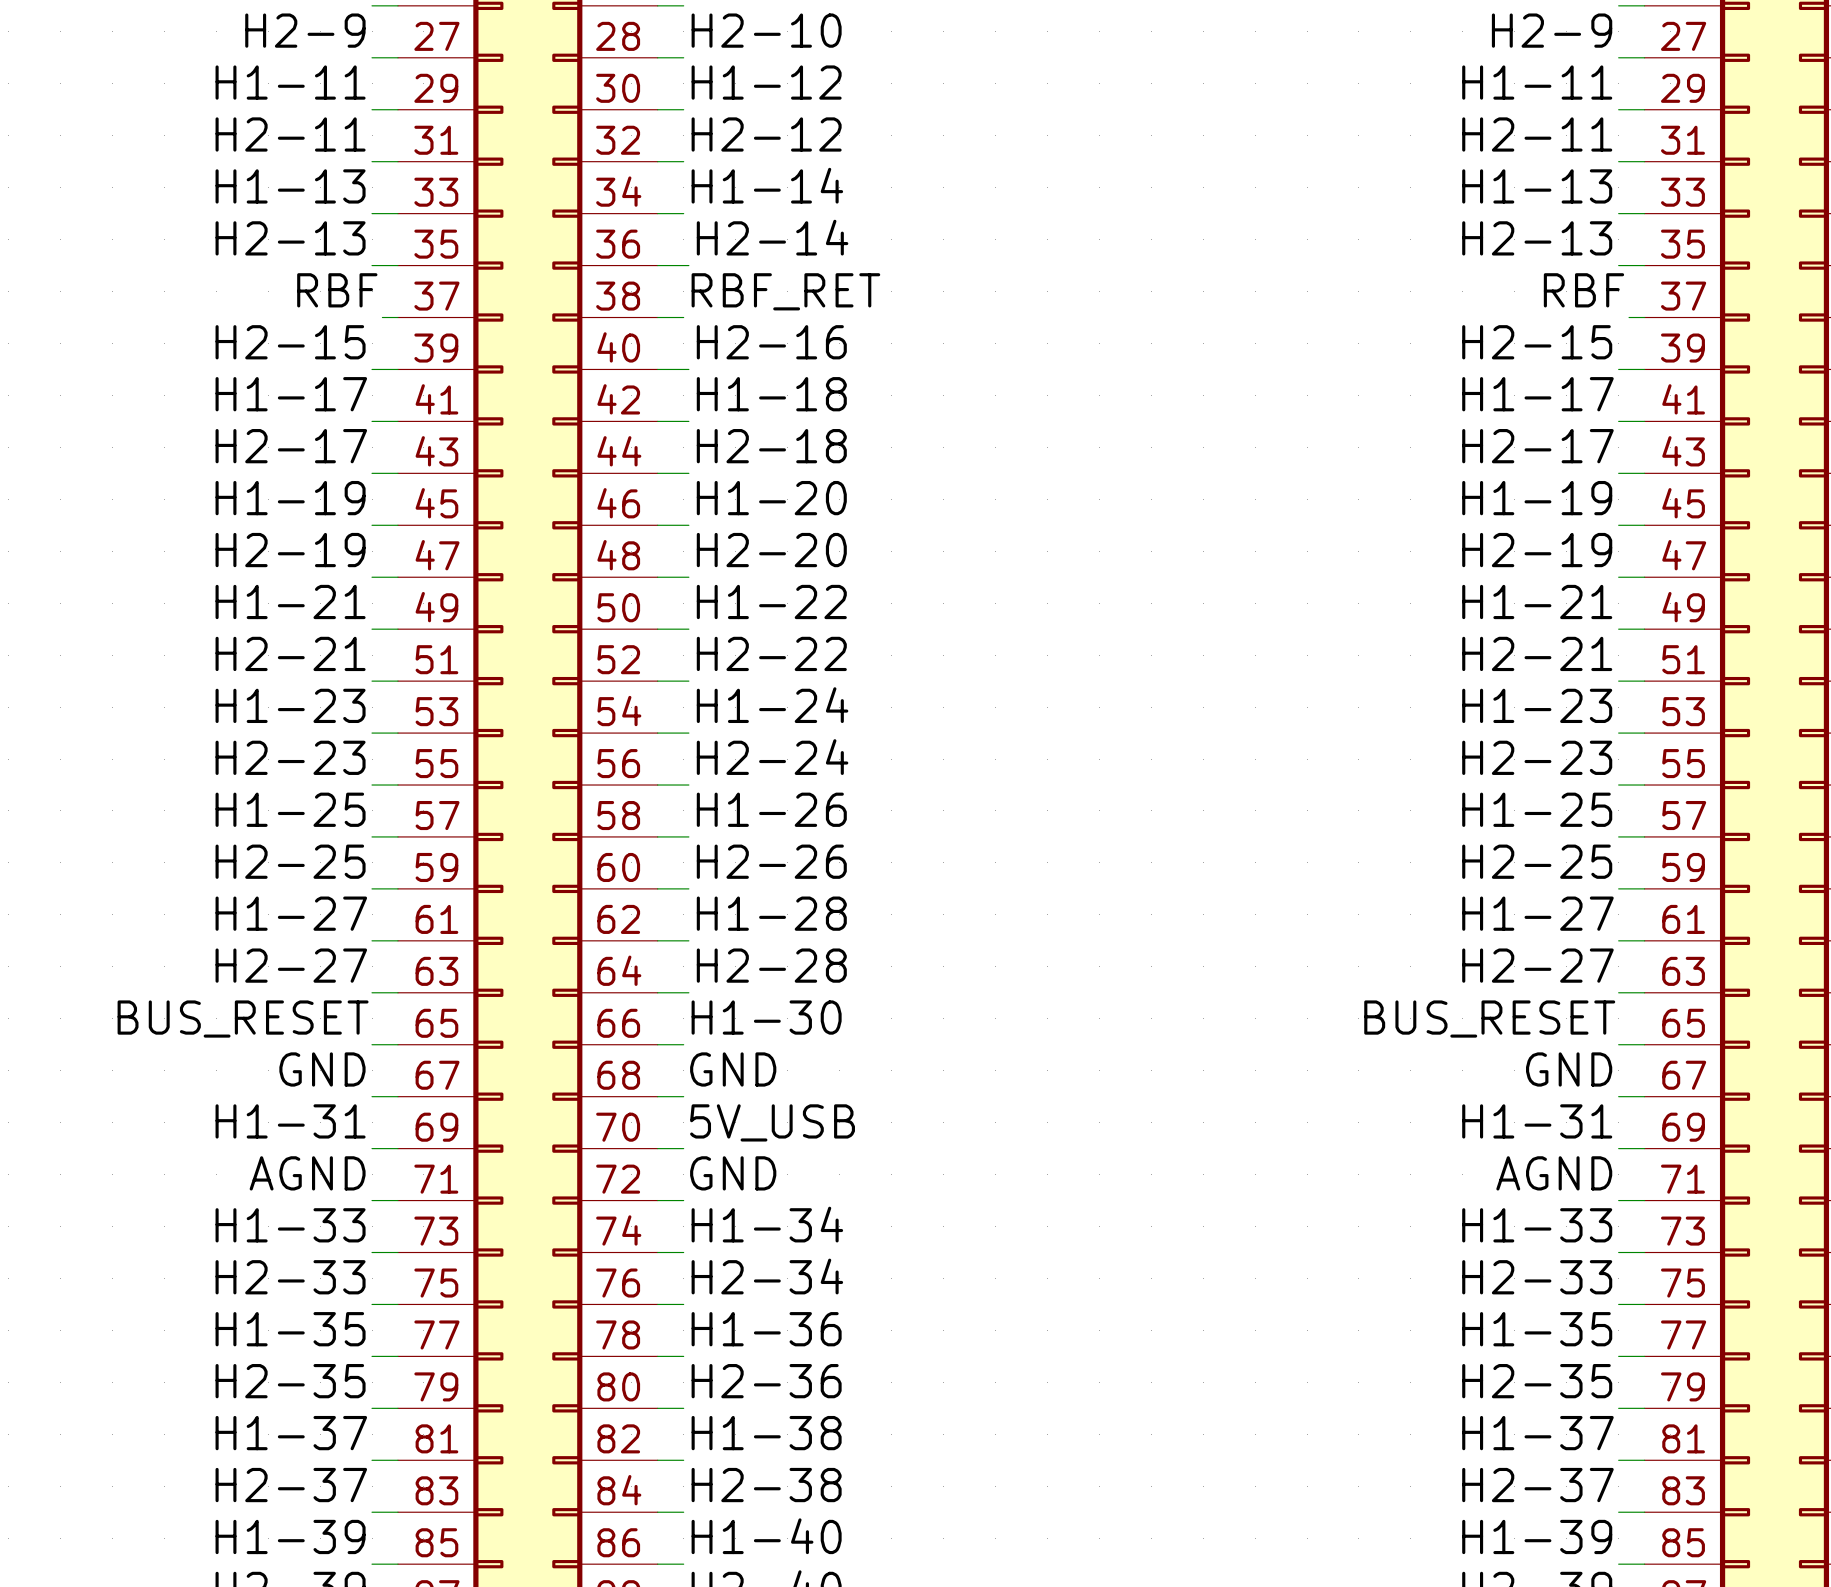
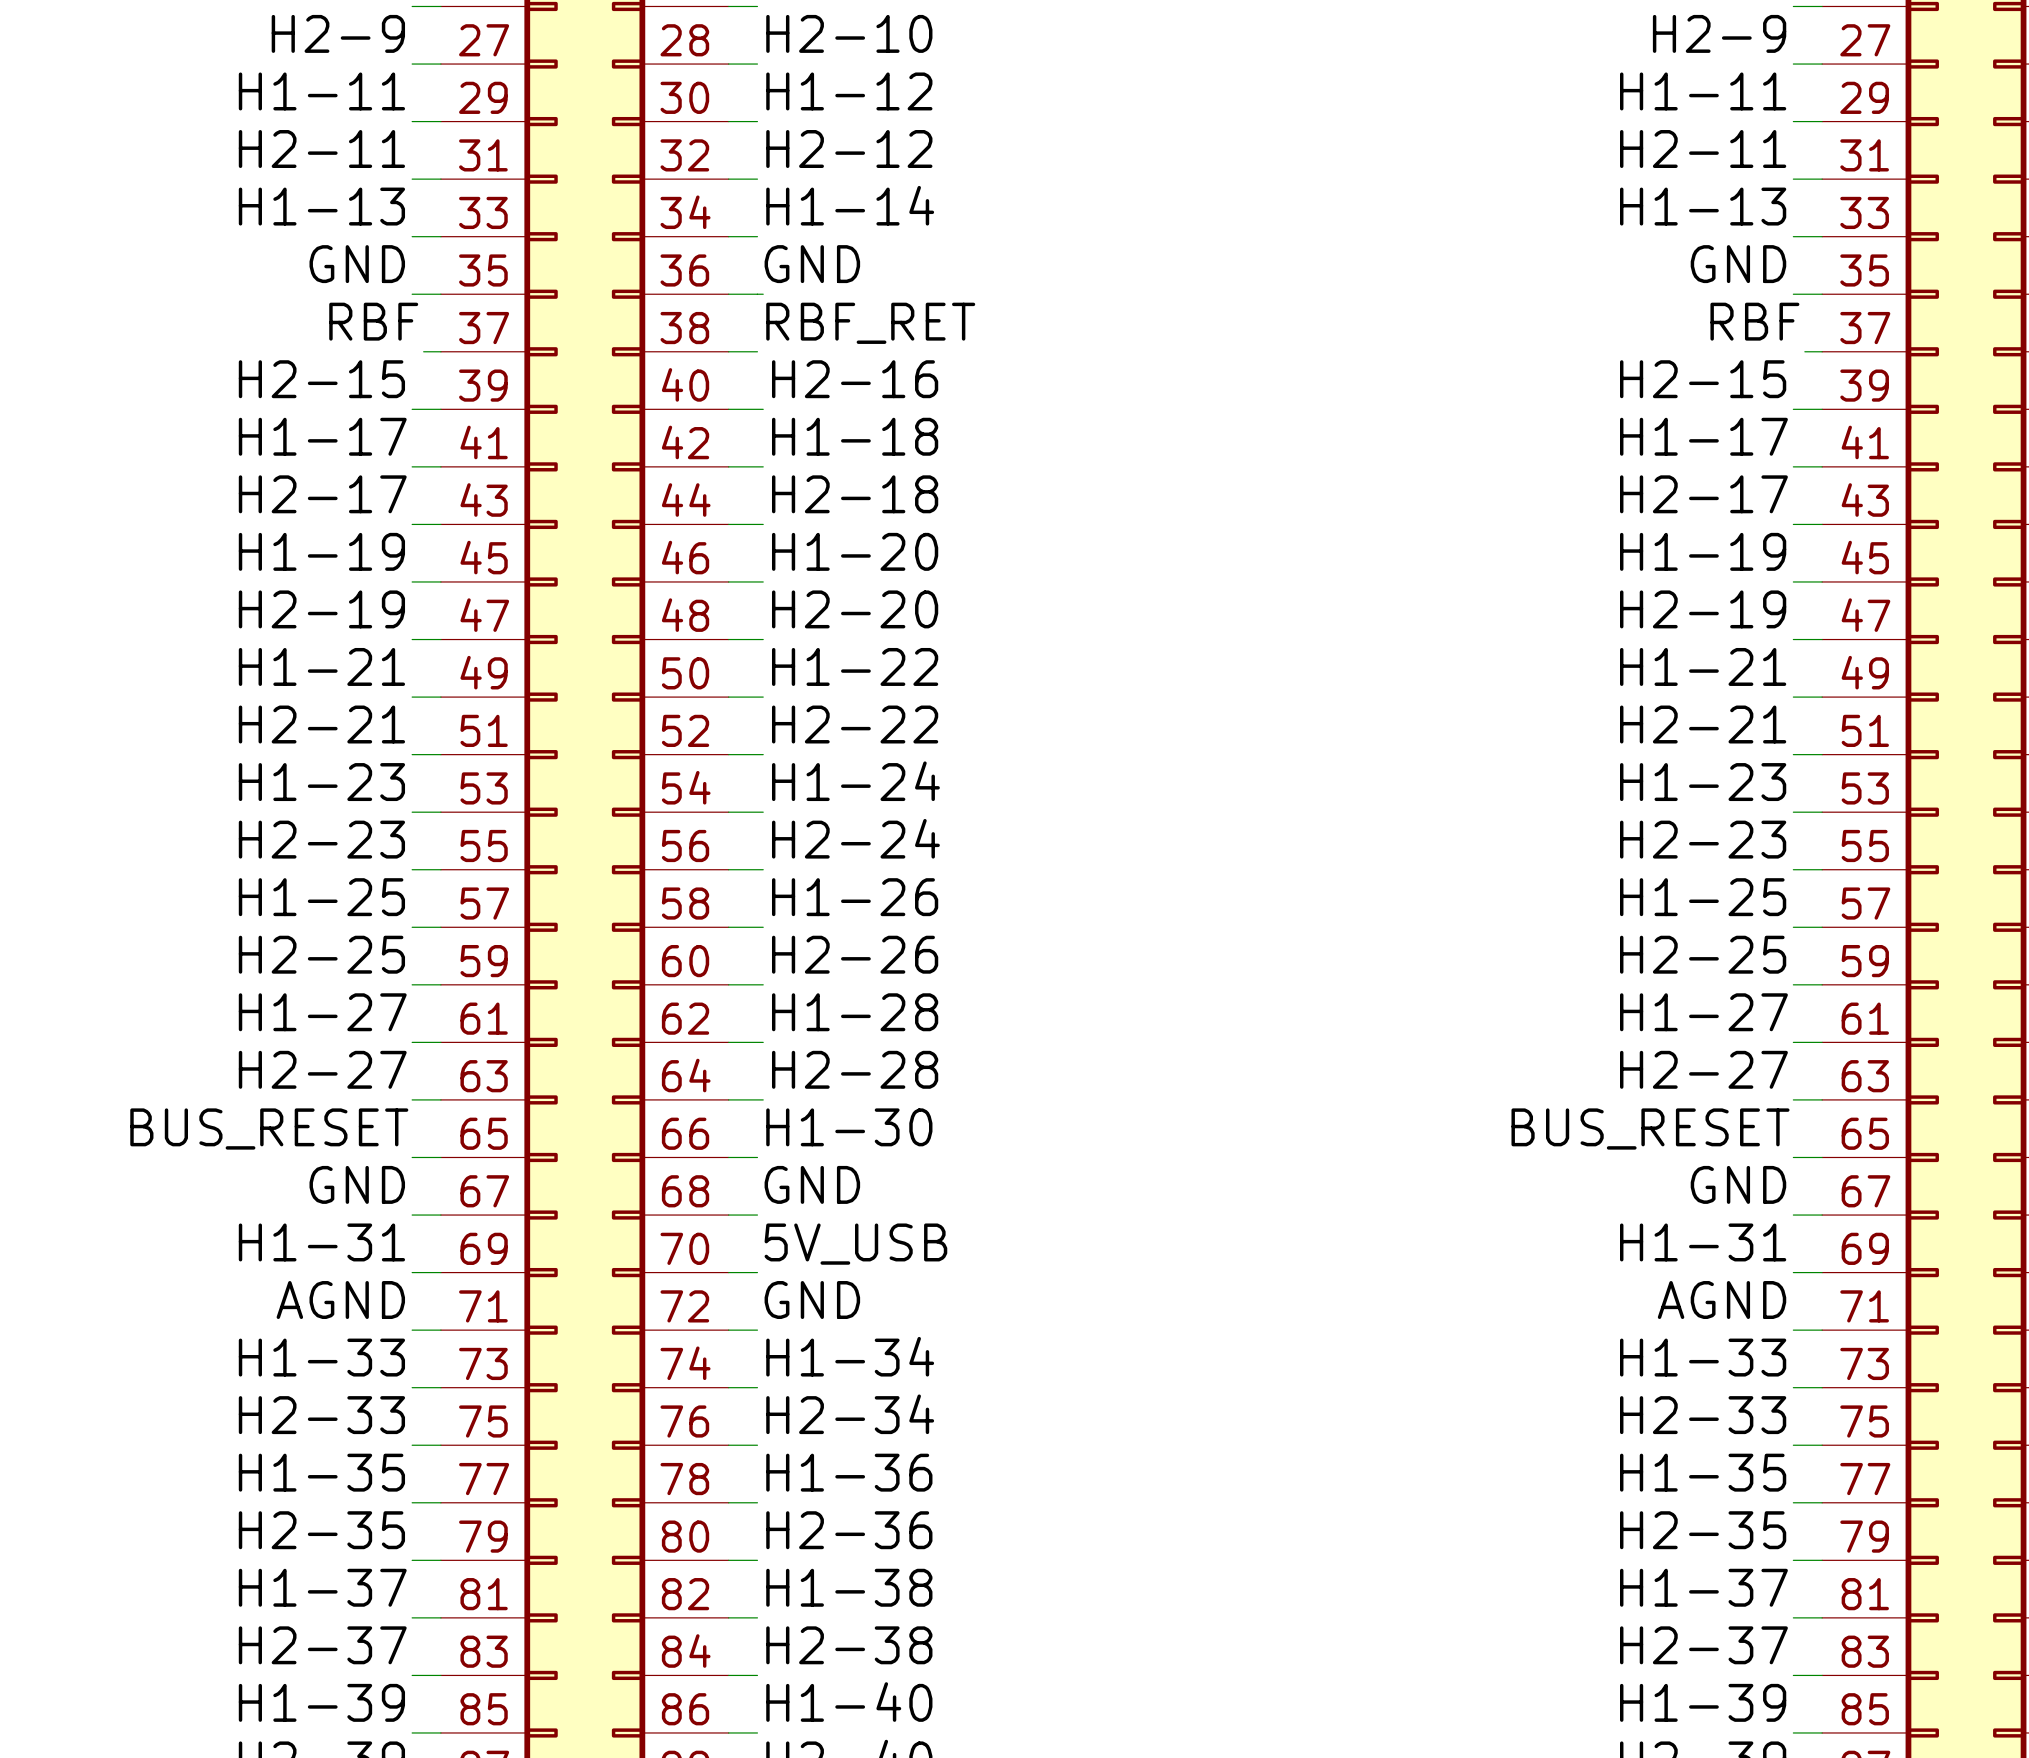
label: H2-14 (772, 237) -> GND (812, 264)
label: H2-13 (290, 238) -> GND (357, 264)
label: H2-13 (1537, 238) -> GND (1738, 264)

